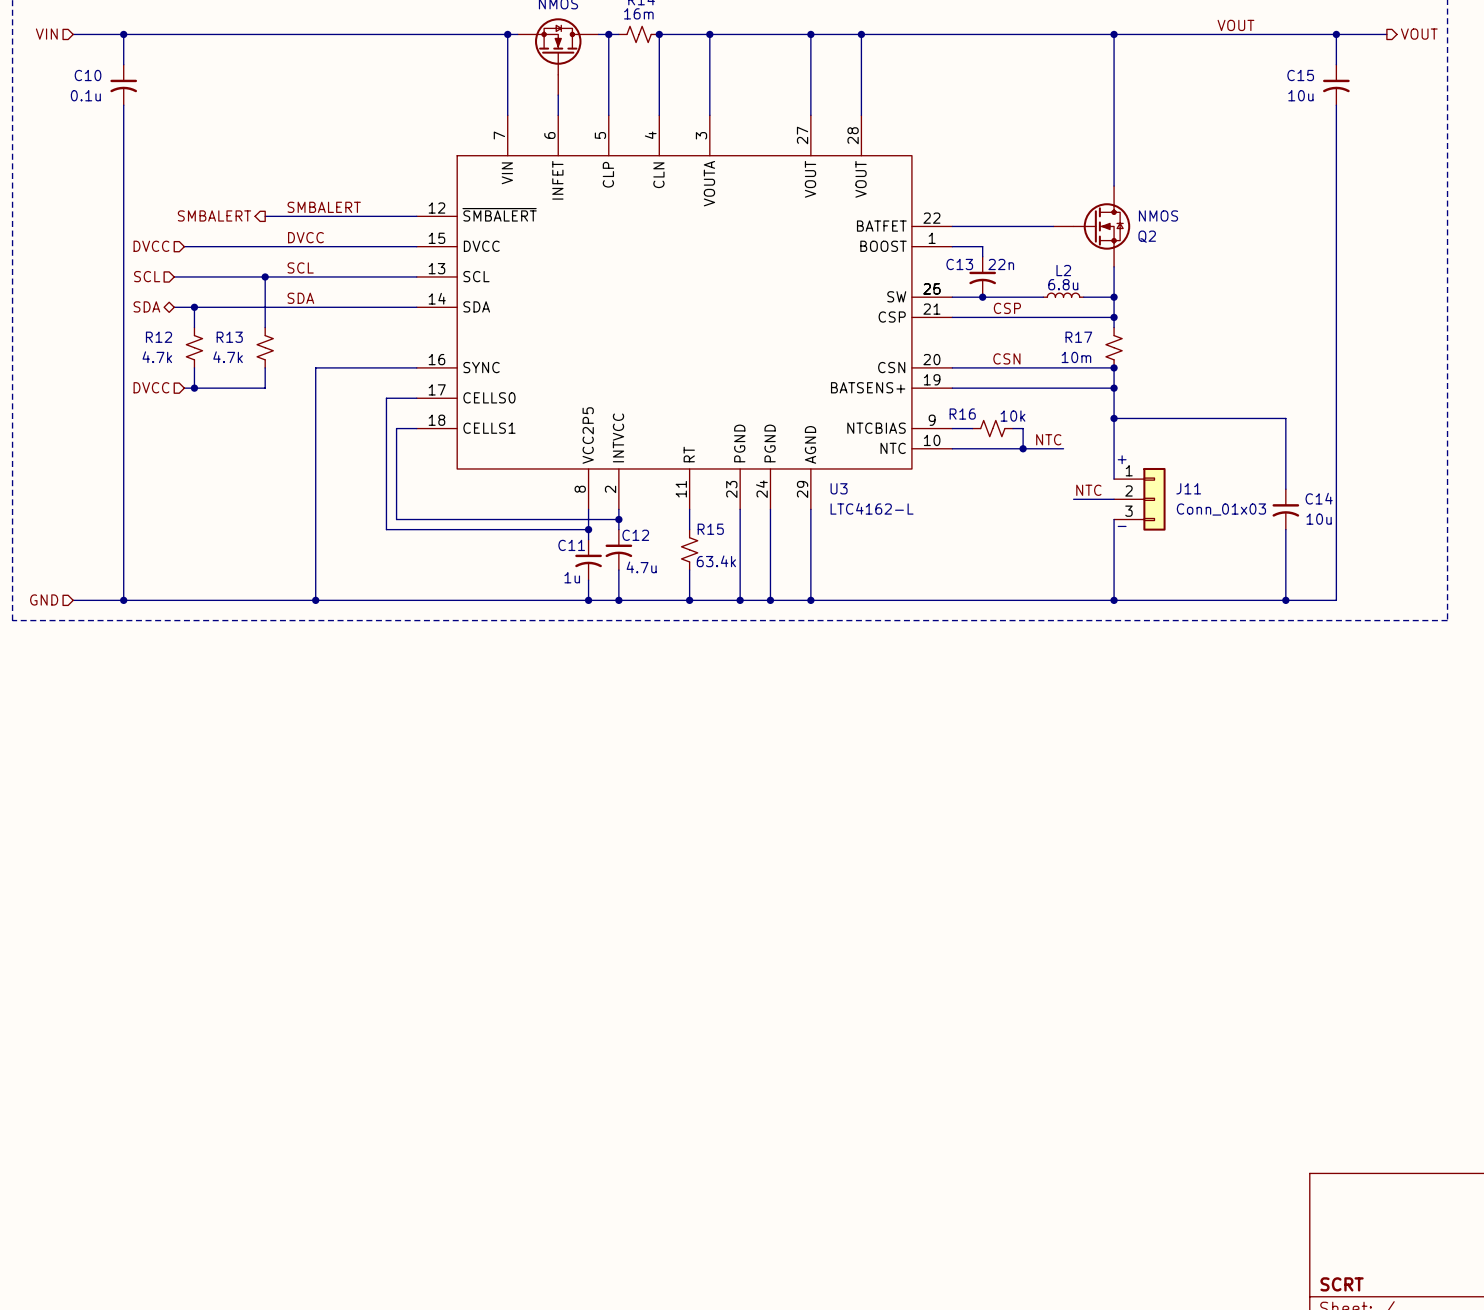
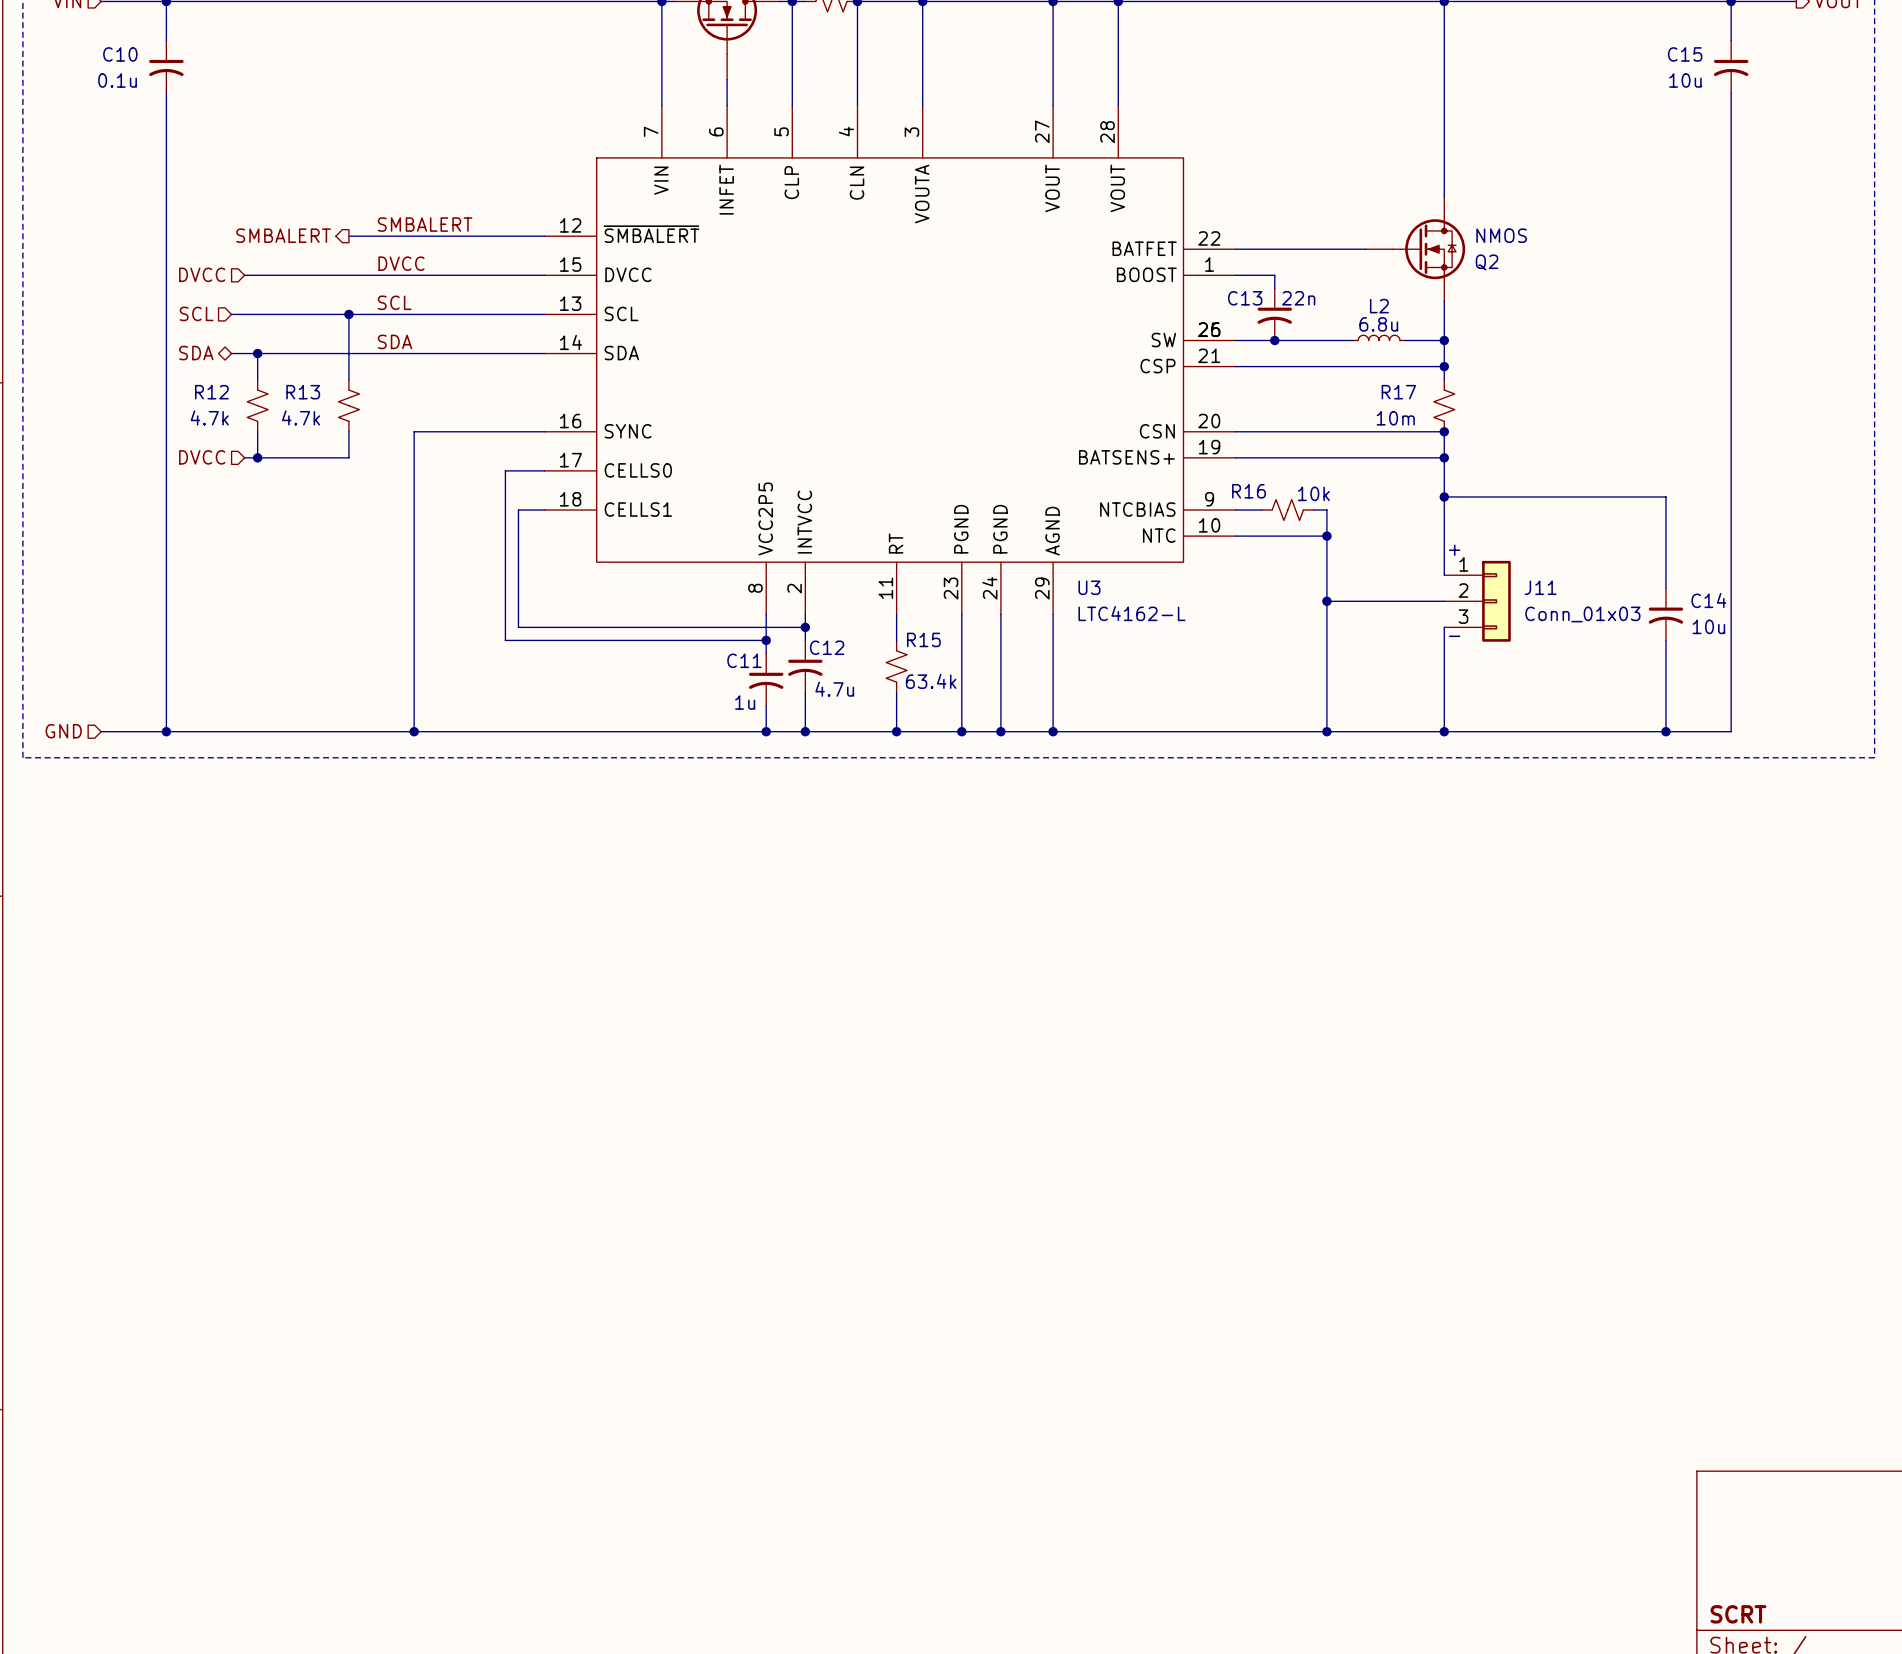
label: CSP (1007, 308) -> none
label: CSN (1006, 358) -> none
label: NTC (1048, 439) -> none
wire: (1023, 448) (1063, 448) -> (1326, 536) (1326, 731)
label: NTC (1088, 490) -> none
wire: none -> (1326, 601) (1392, 601)
junction: none -> (1326, 601)
junction: none -> (1326, 731)

